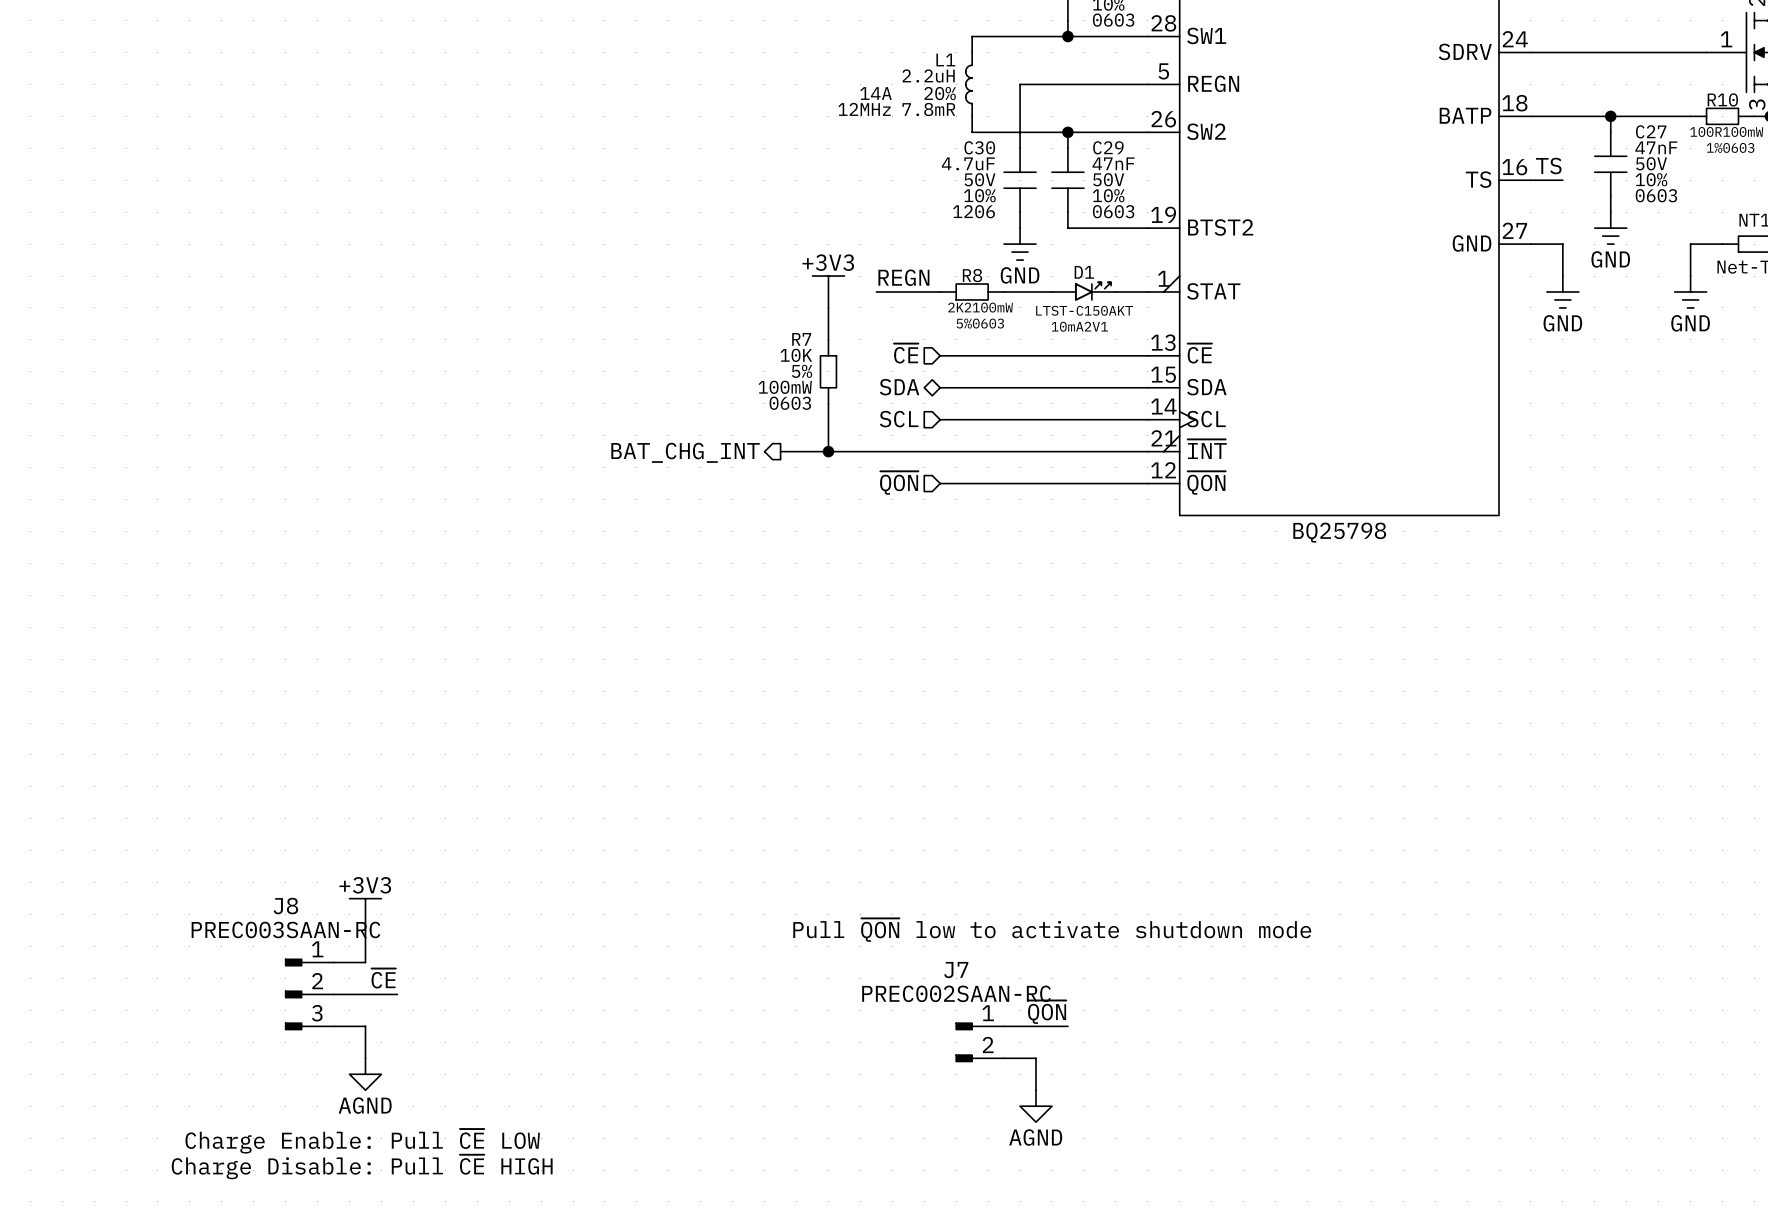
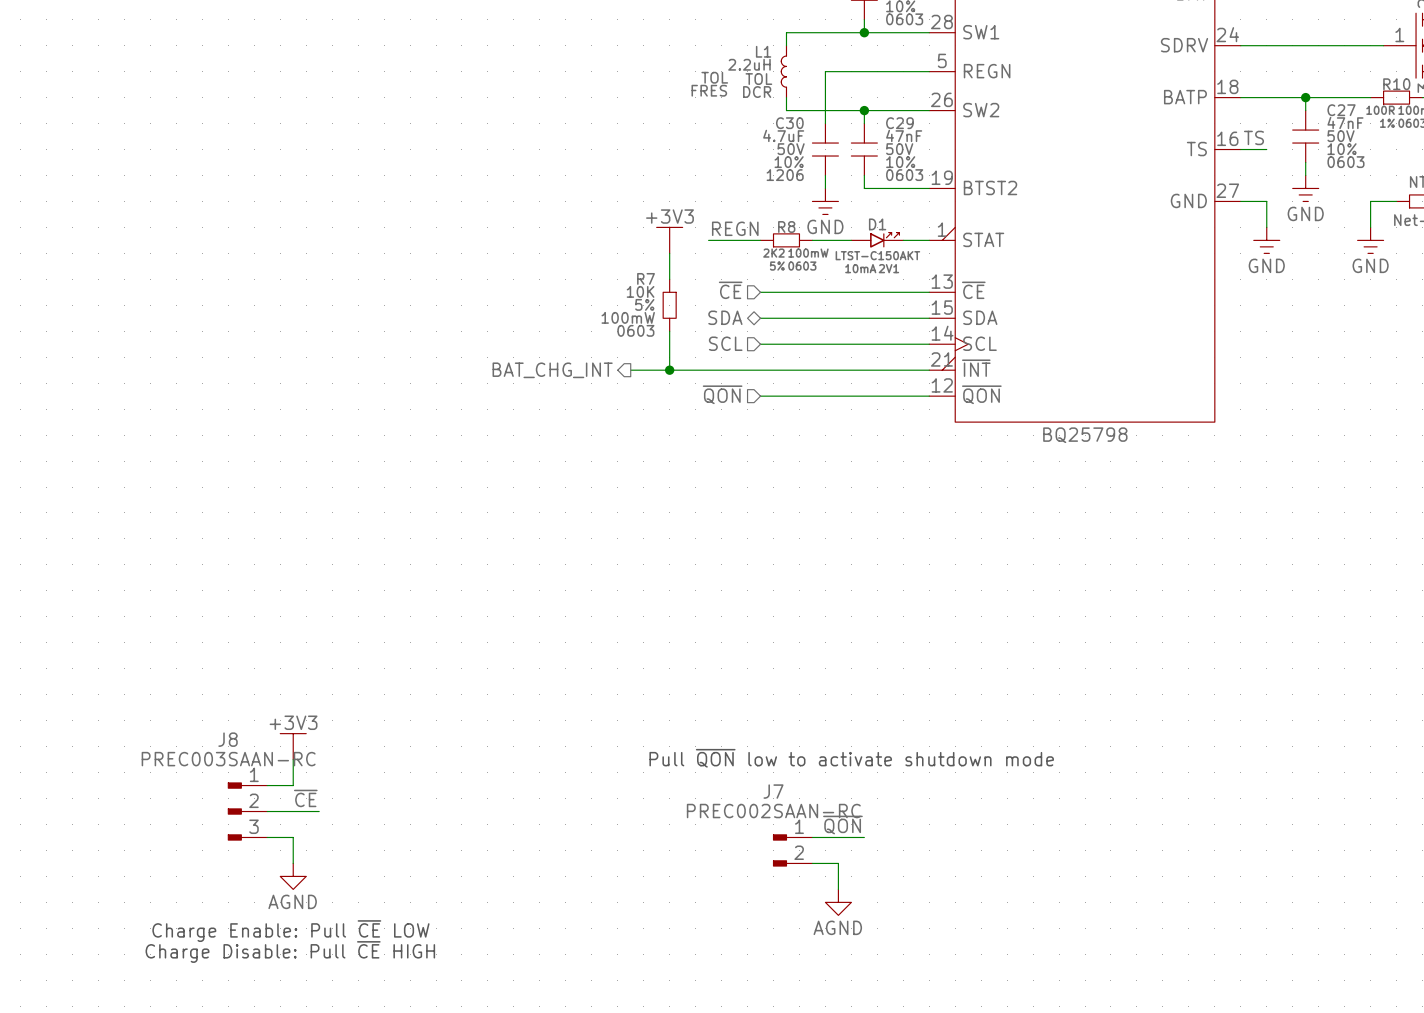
L1 text: 14A (876, 93) -> TOL (714, 77)
L1 text: 20% (940, 93) -> TOL (758, 79)
L1 text: 12MHz (864, 109) -> FRES (709, 90)
L1 text: 7.8mR (928, 109) -> DCR (757, 92)

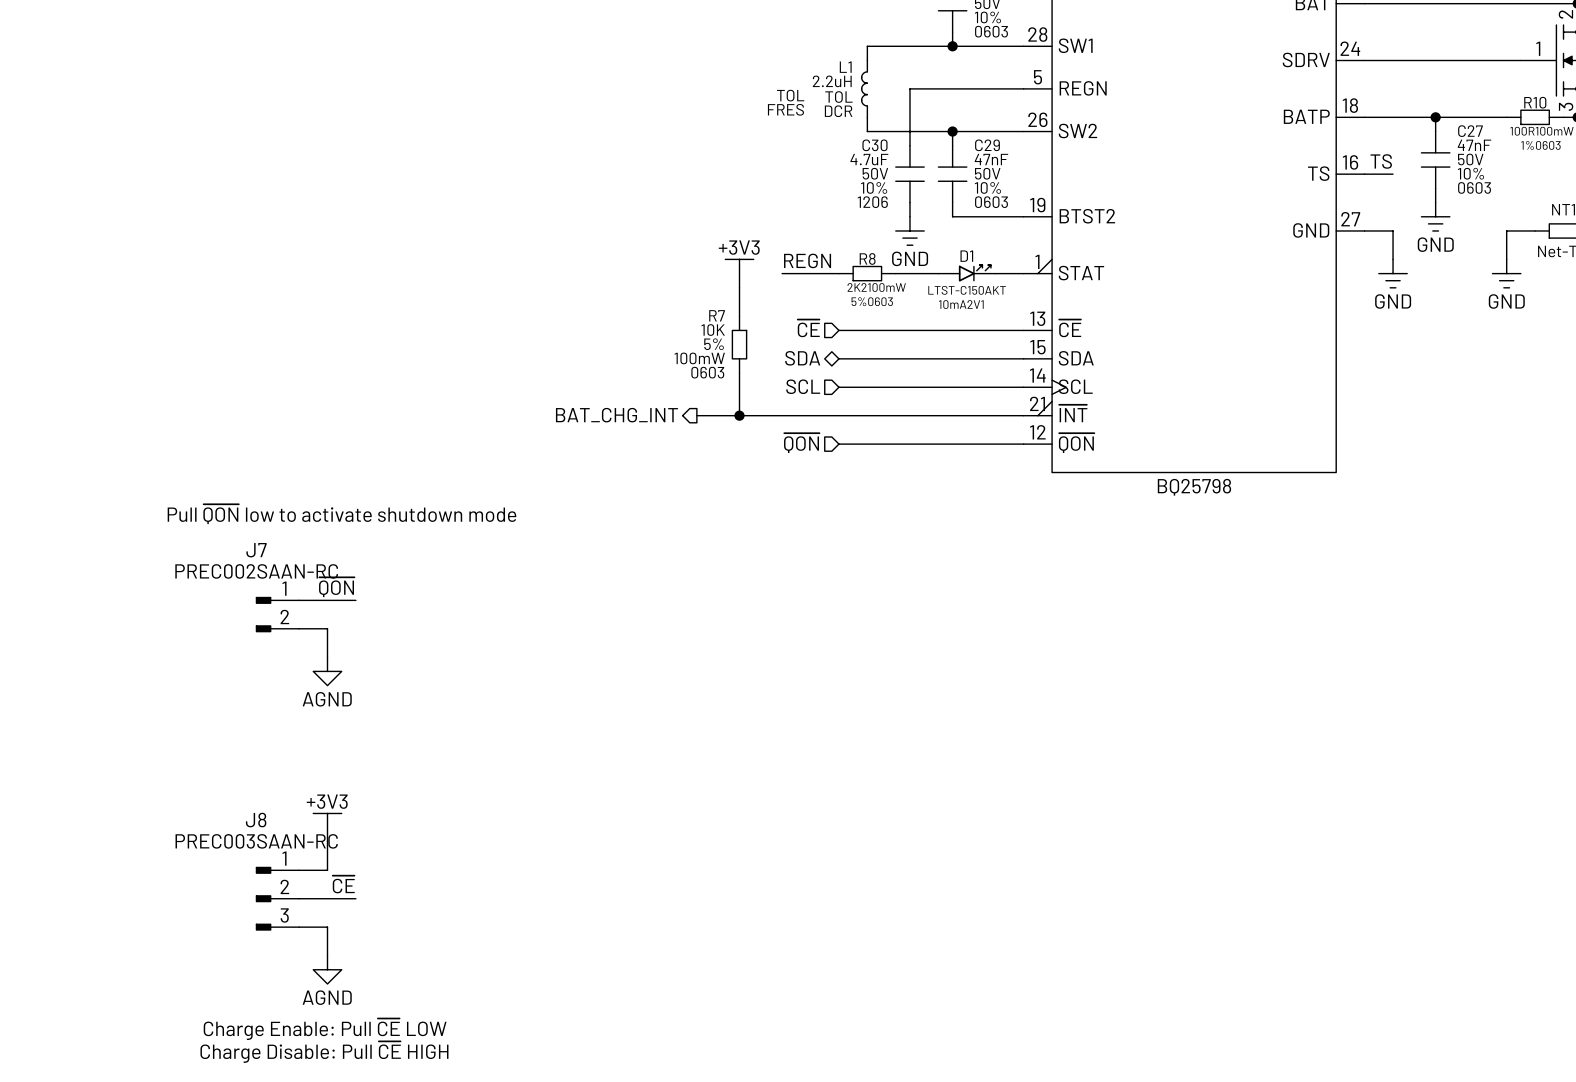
text: none -> Pull ~{QON} low to activate shutdown mode (341, 514)
label: none -> ~{QON} (336, 587)
wire: none -> (299, 600) (355, 600)
wire: none -> (299, 628) (327, 628) (327, 657)
power symbol: none -> AGND (327, 671)
text: Pull ~{QON} low to activate shutdown mode (851, 758) -> none
label: ~{QON} (842, 825) -> none
wire: (812, 837) (864, 837) -> none
J7 position: (792, 850) -> (277, 614)
wire: (812, 863) (838, 863) (838, 889) -> none
power symbol: AGND (838, 902) -> none

